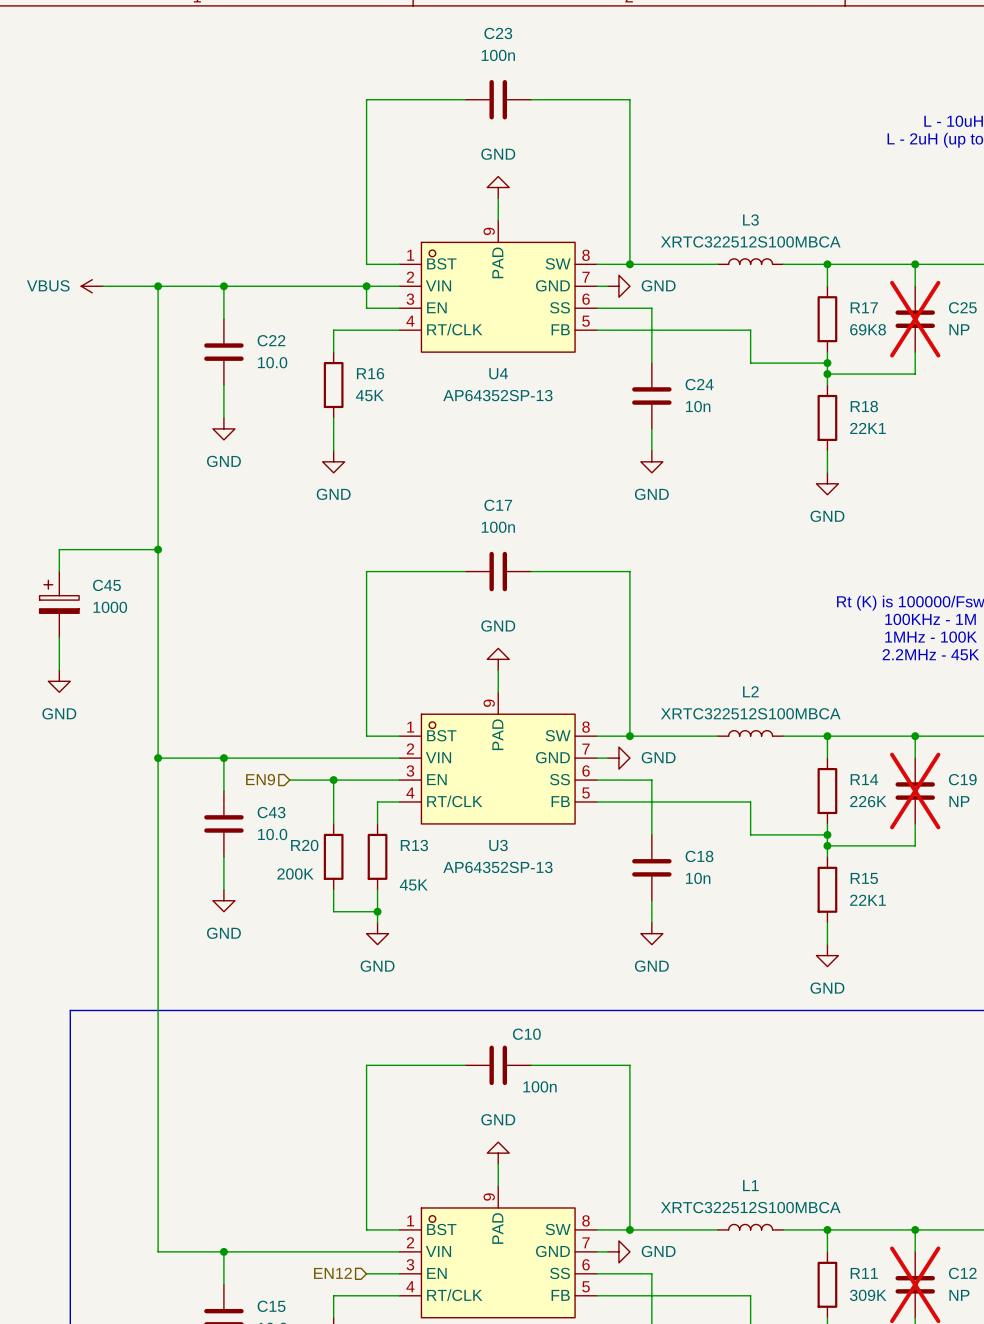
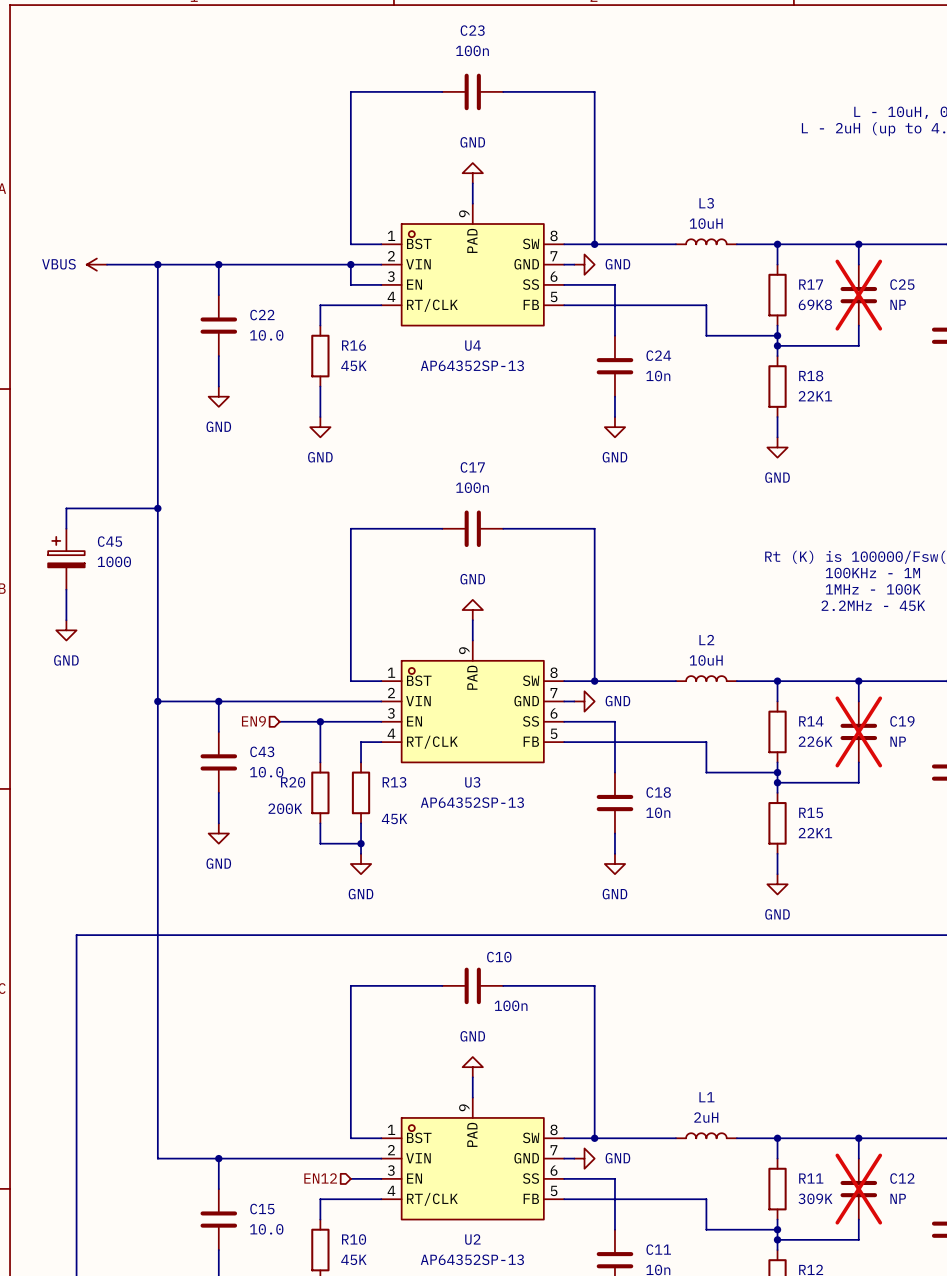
L3 value: XRTC322512S100MBCA (750, 241) -> 10uH (706, 223)
L2 value: XRTC322512S100MBCA (750, 713) -> 10uH (706, 660)
L1 value: XRTC322512S100MBCA (750, 1207) -> 2uH (706, 1117)

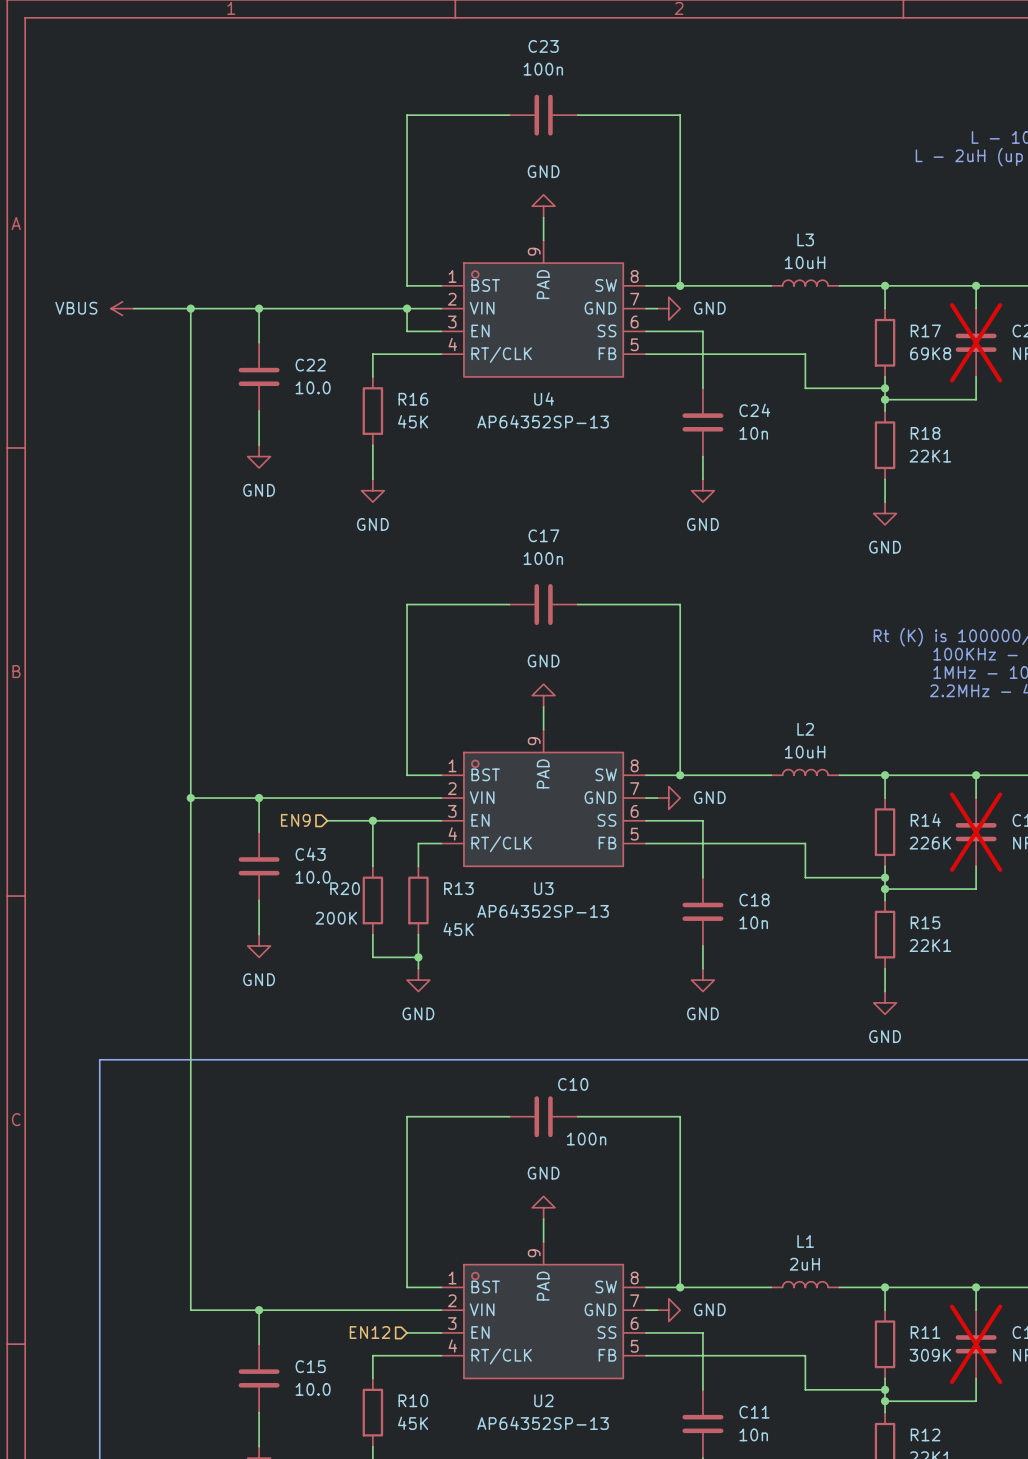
wire: (157, 508) (66, 508) (66, 528) -> none
junction: (157, 508) -> none
C45: 1000 (66, 559) -> none
wire: (66, 589) (66, 620) -> none
power symbol: GND (66, 630) -> none

